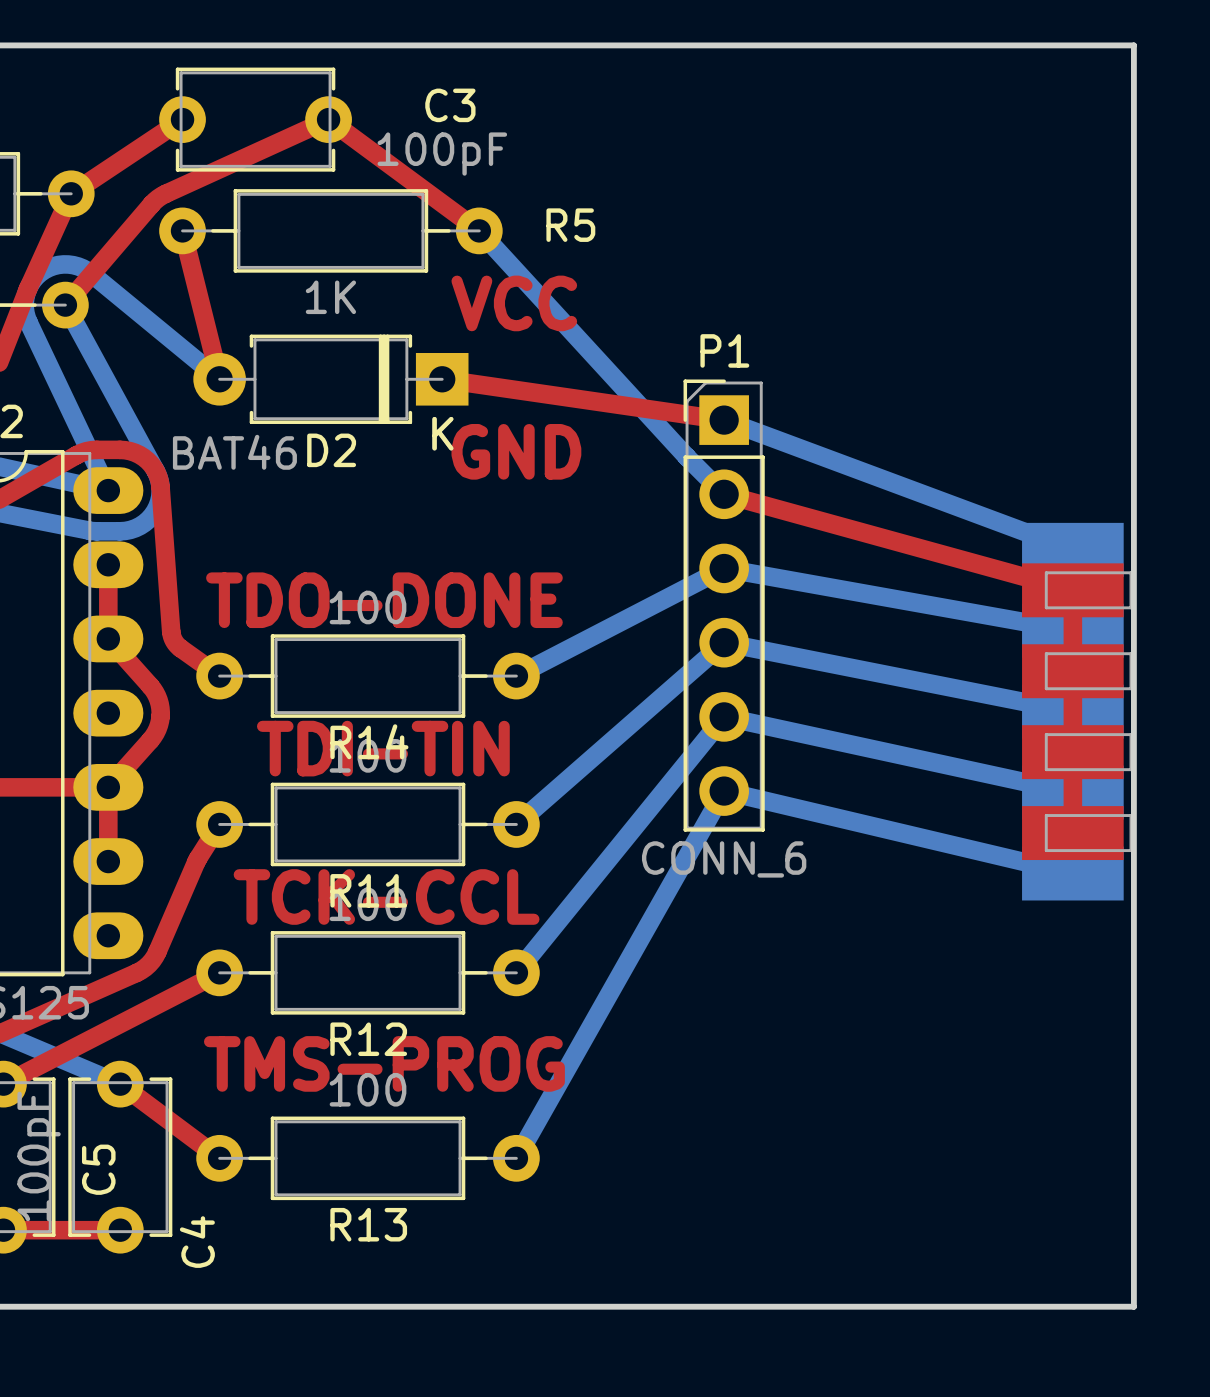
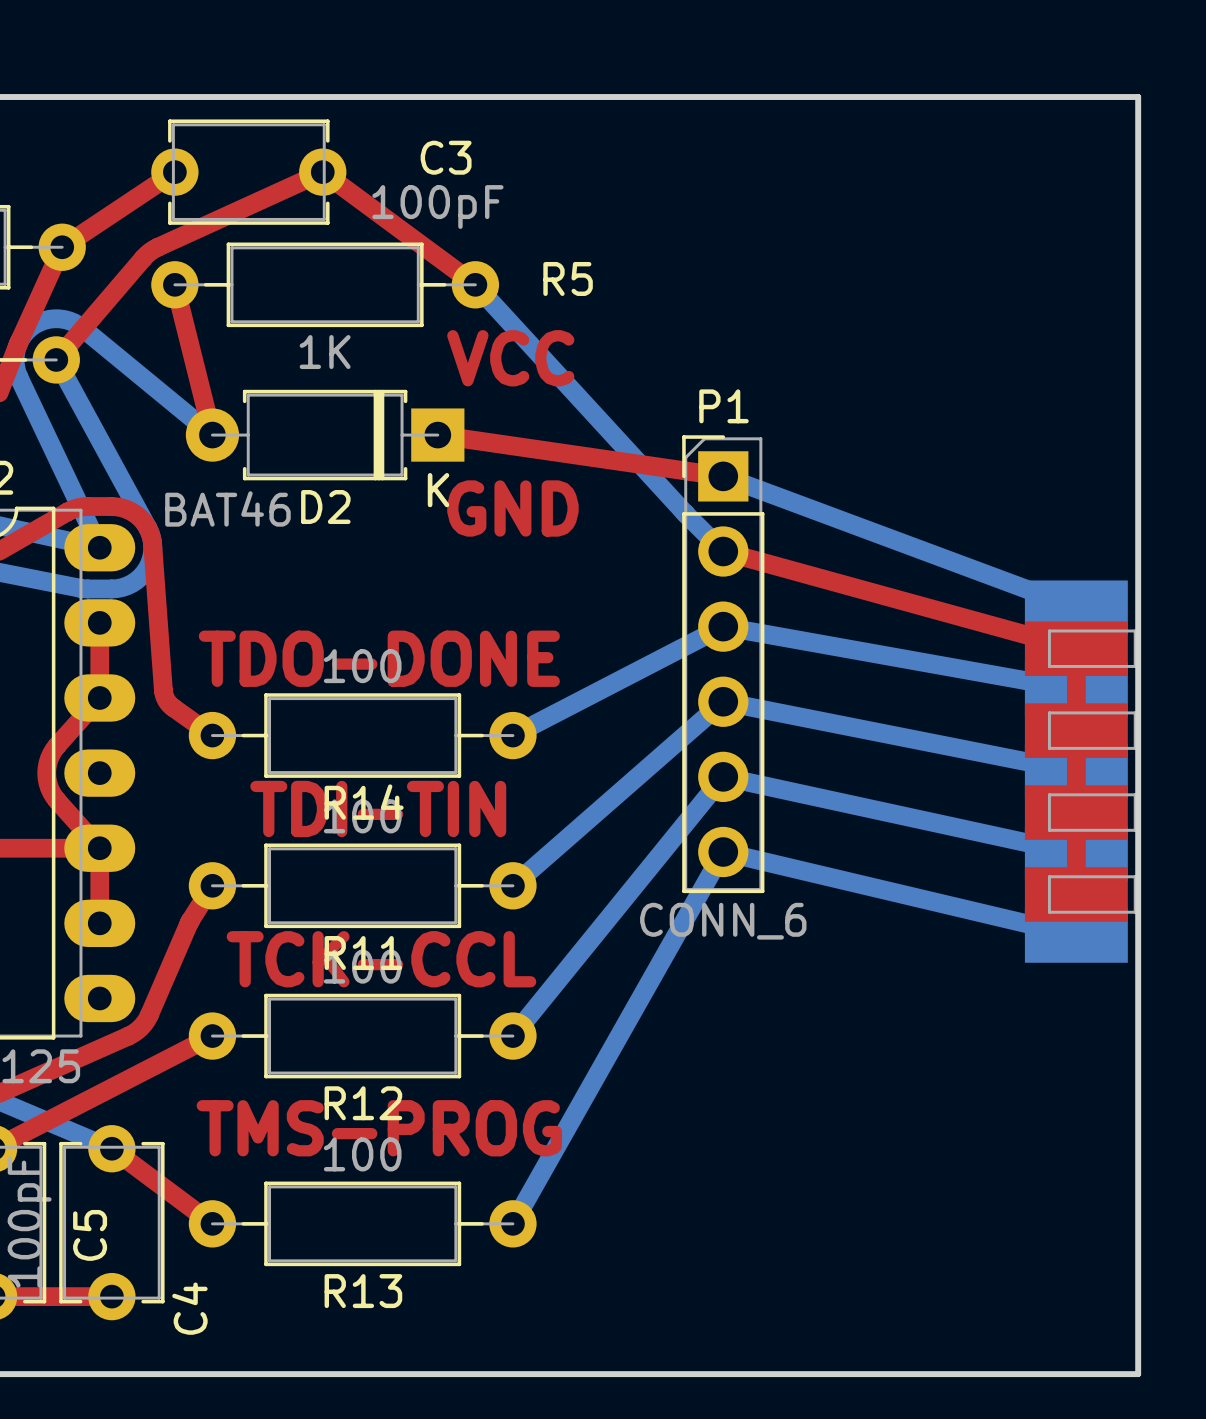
top track: (108, 638) (152, 689) (158, 700) (160, 712) (159, 724) (153, 736) (108, 787) -> (99, 697) (54, 749) (49, 758) (46, 773) (47, 783) (54, 796) (99, 848)

